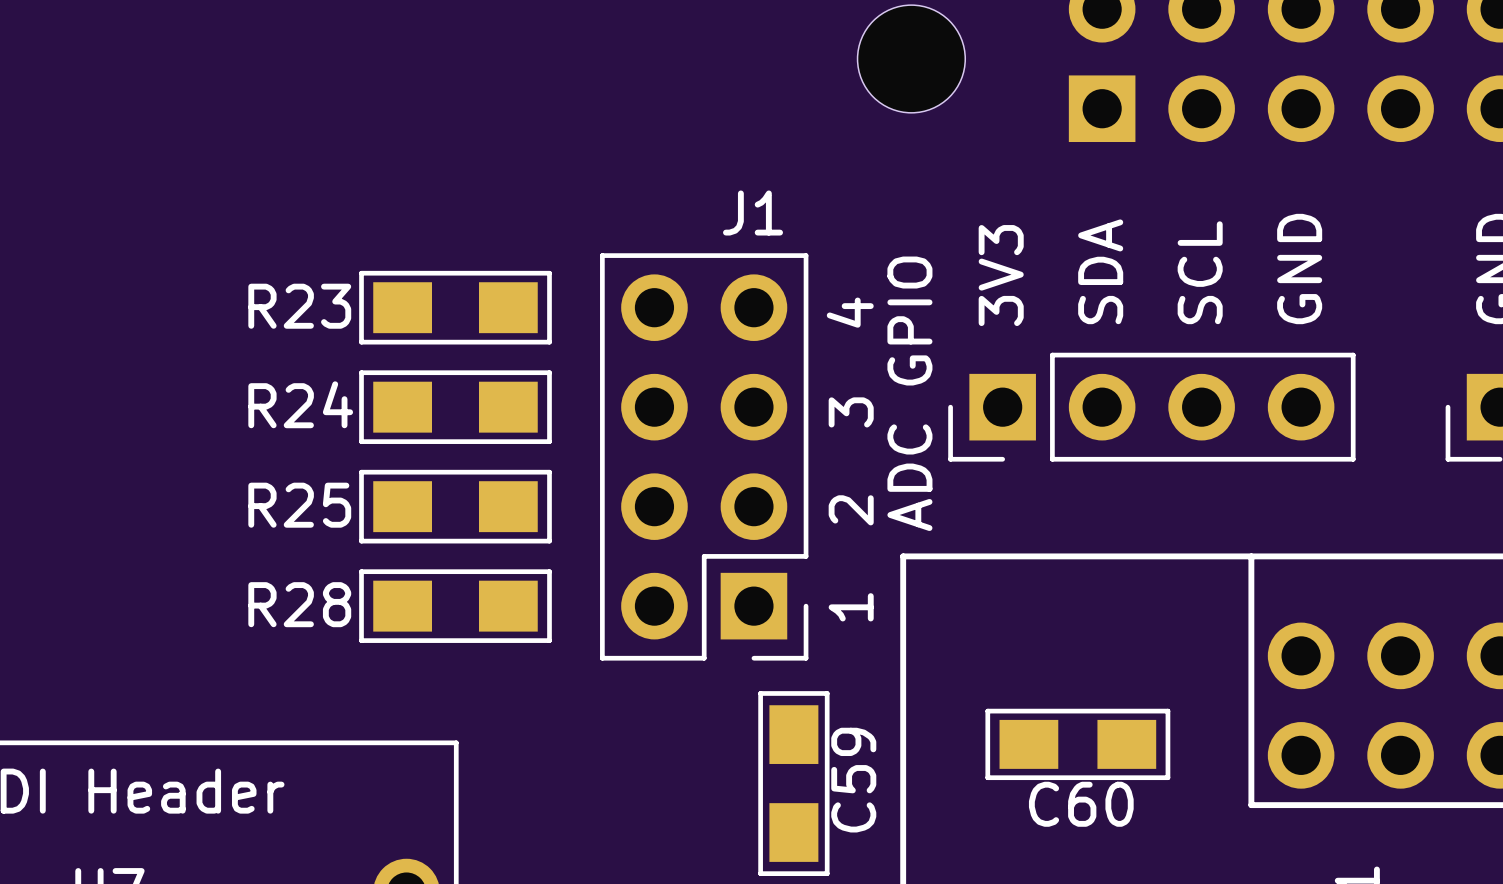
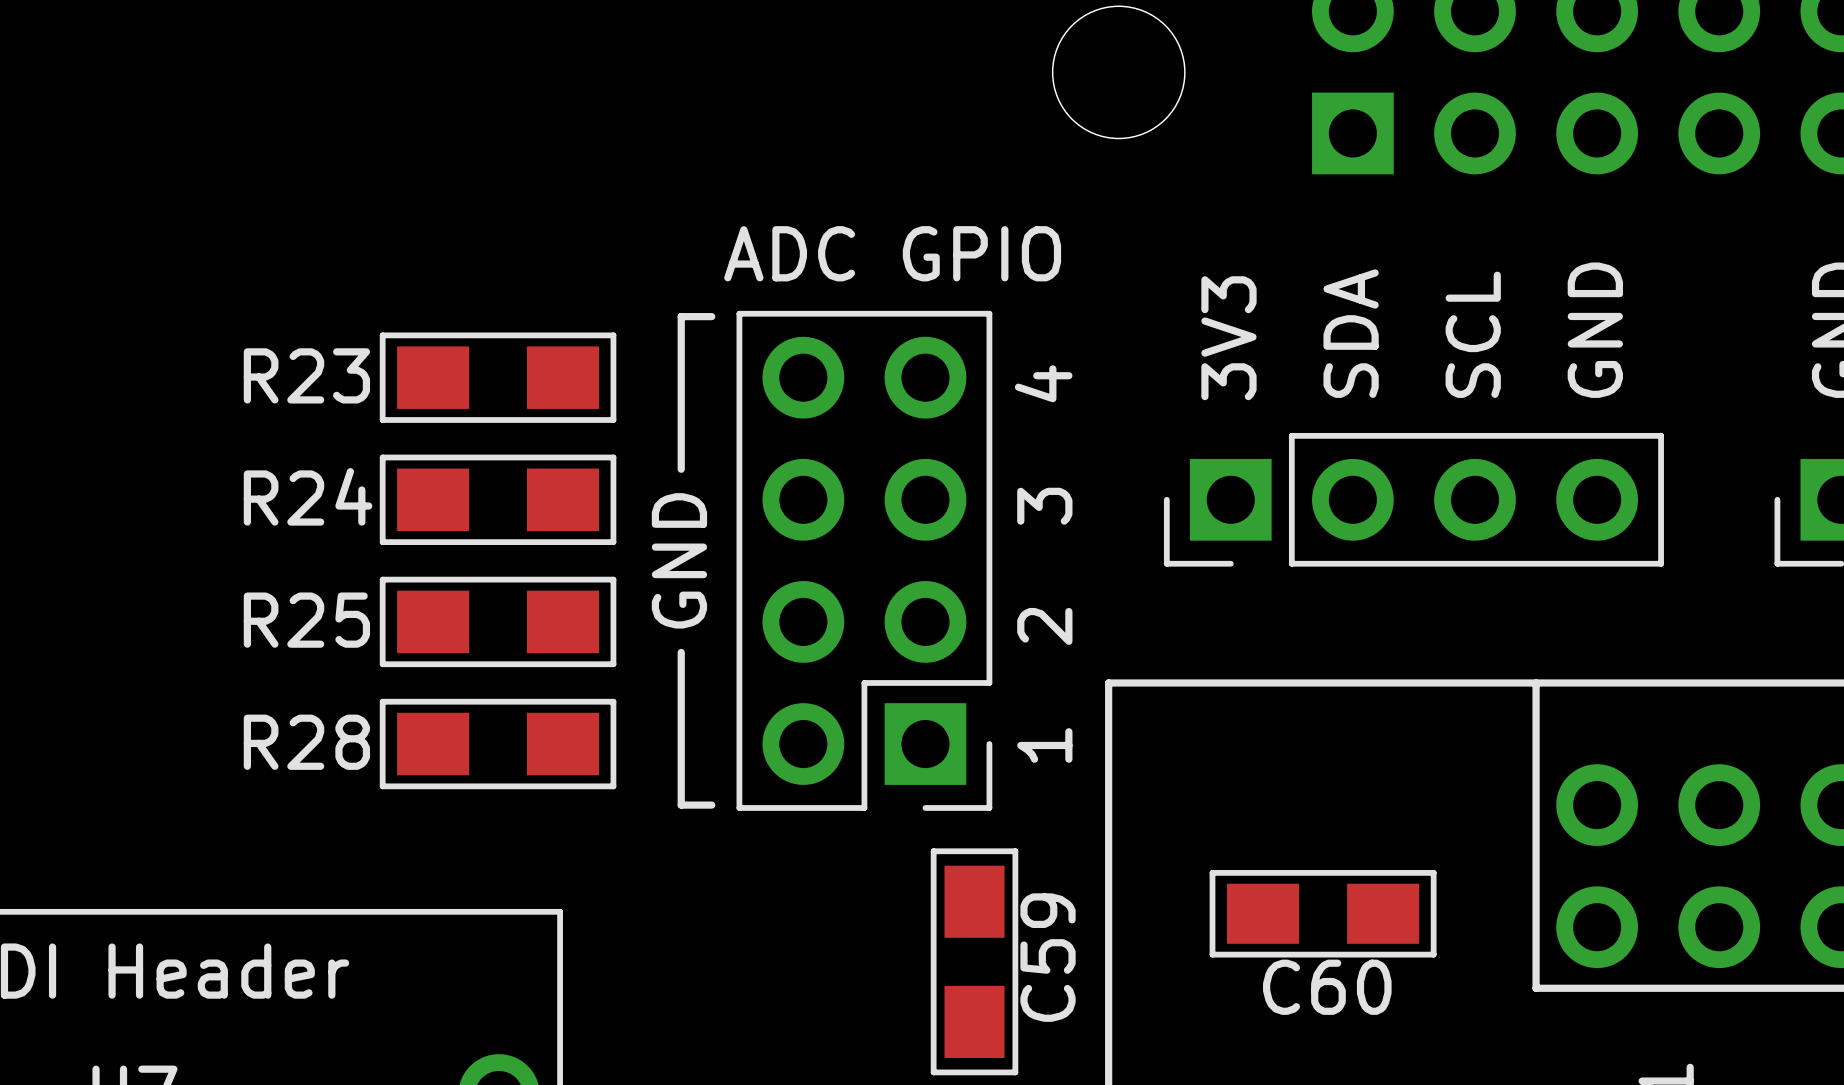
J1 name: J1 (753, 213) -> none
line: none -> (711, 316) (681, 316) (681, 469)
R23 position: (455, 307) -> (498, 377)
text rotation: 0° (909, 393) -> 90° clockwise (892, 253)
R24 position: (455, 407) -> (498, 499)
text: none -> GND (679, 560)
R25 position: (455, 506) -> (498, 621)
line: none -> (681, 652) (681, 805) (711, 805)
R28 position: (455, 606) -> (498, 744)

